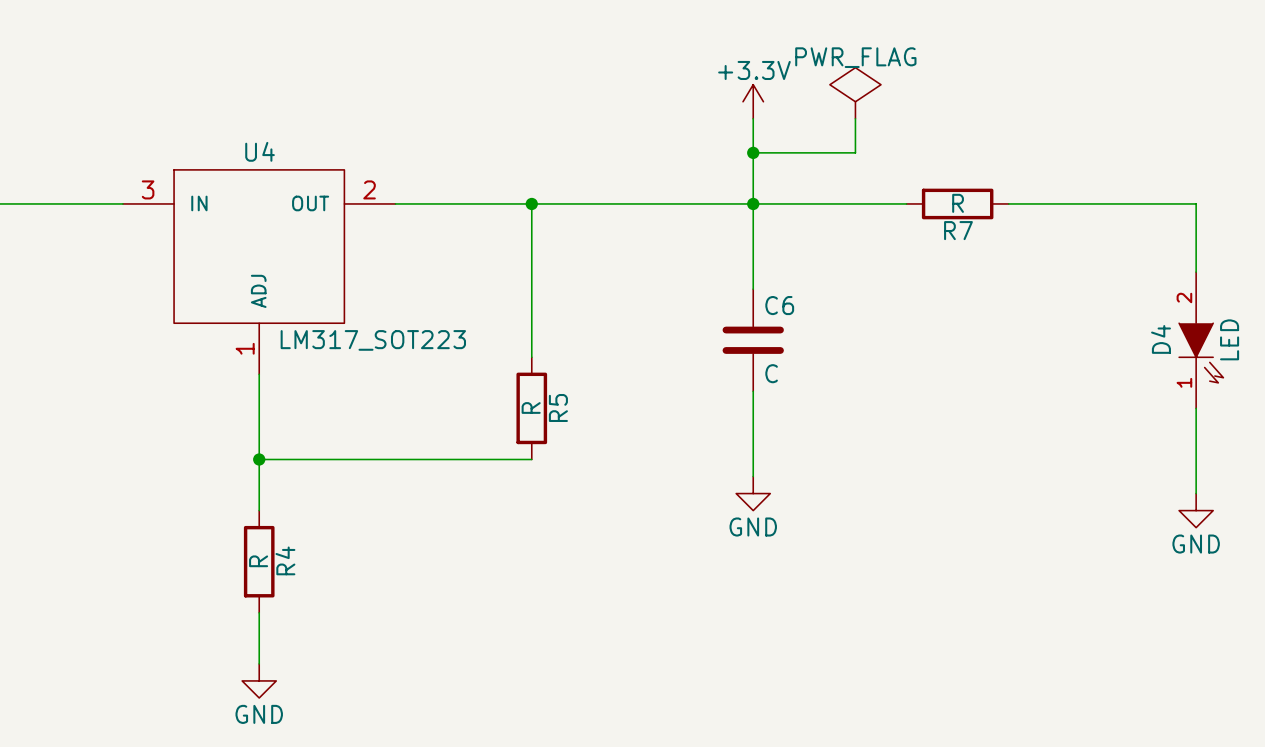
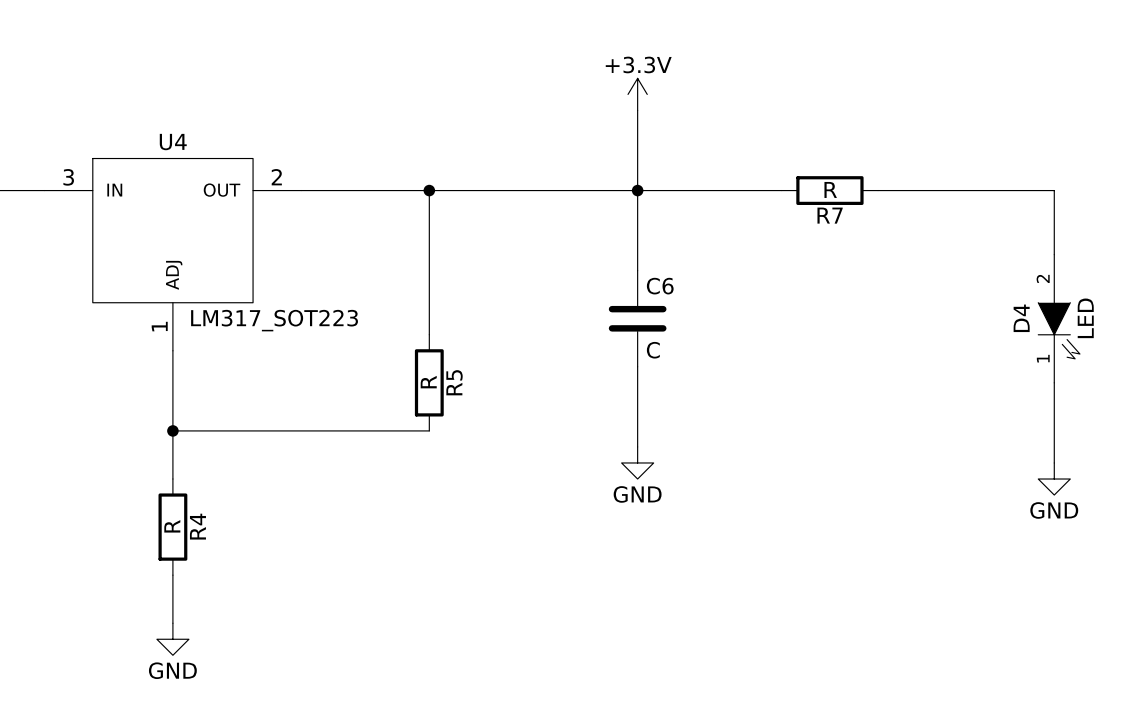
power symbol: PWR_FLAG (855, 93) -> none
wire: (855, 118) (855, 152) (753, 152) -> none
junction: (753, 152) -> none

